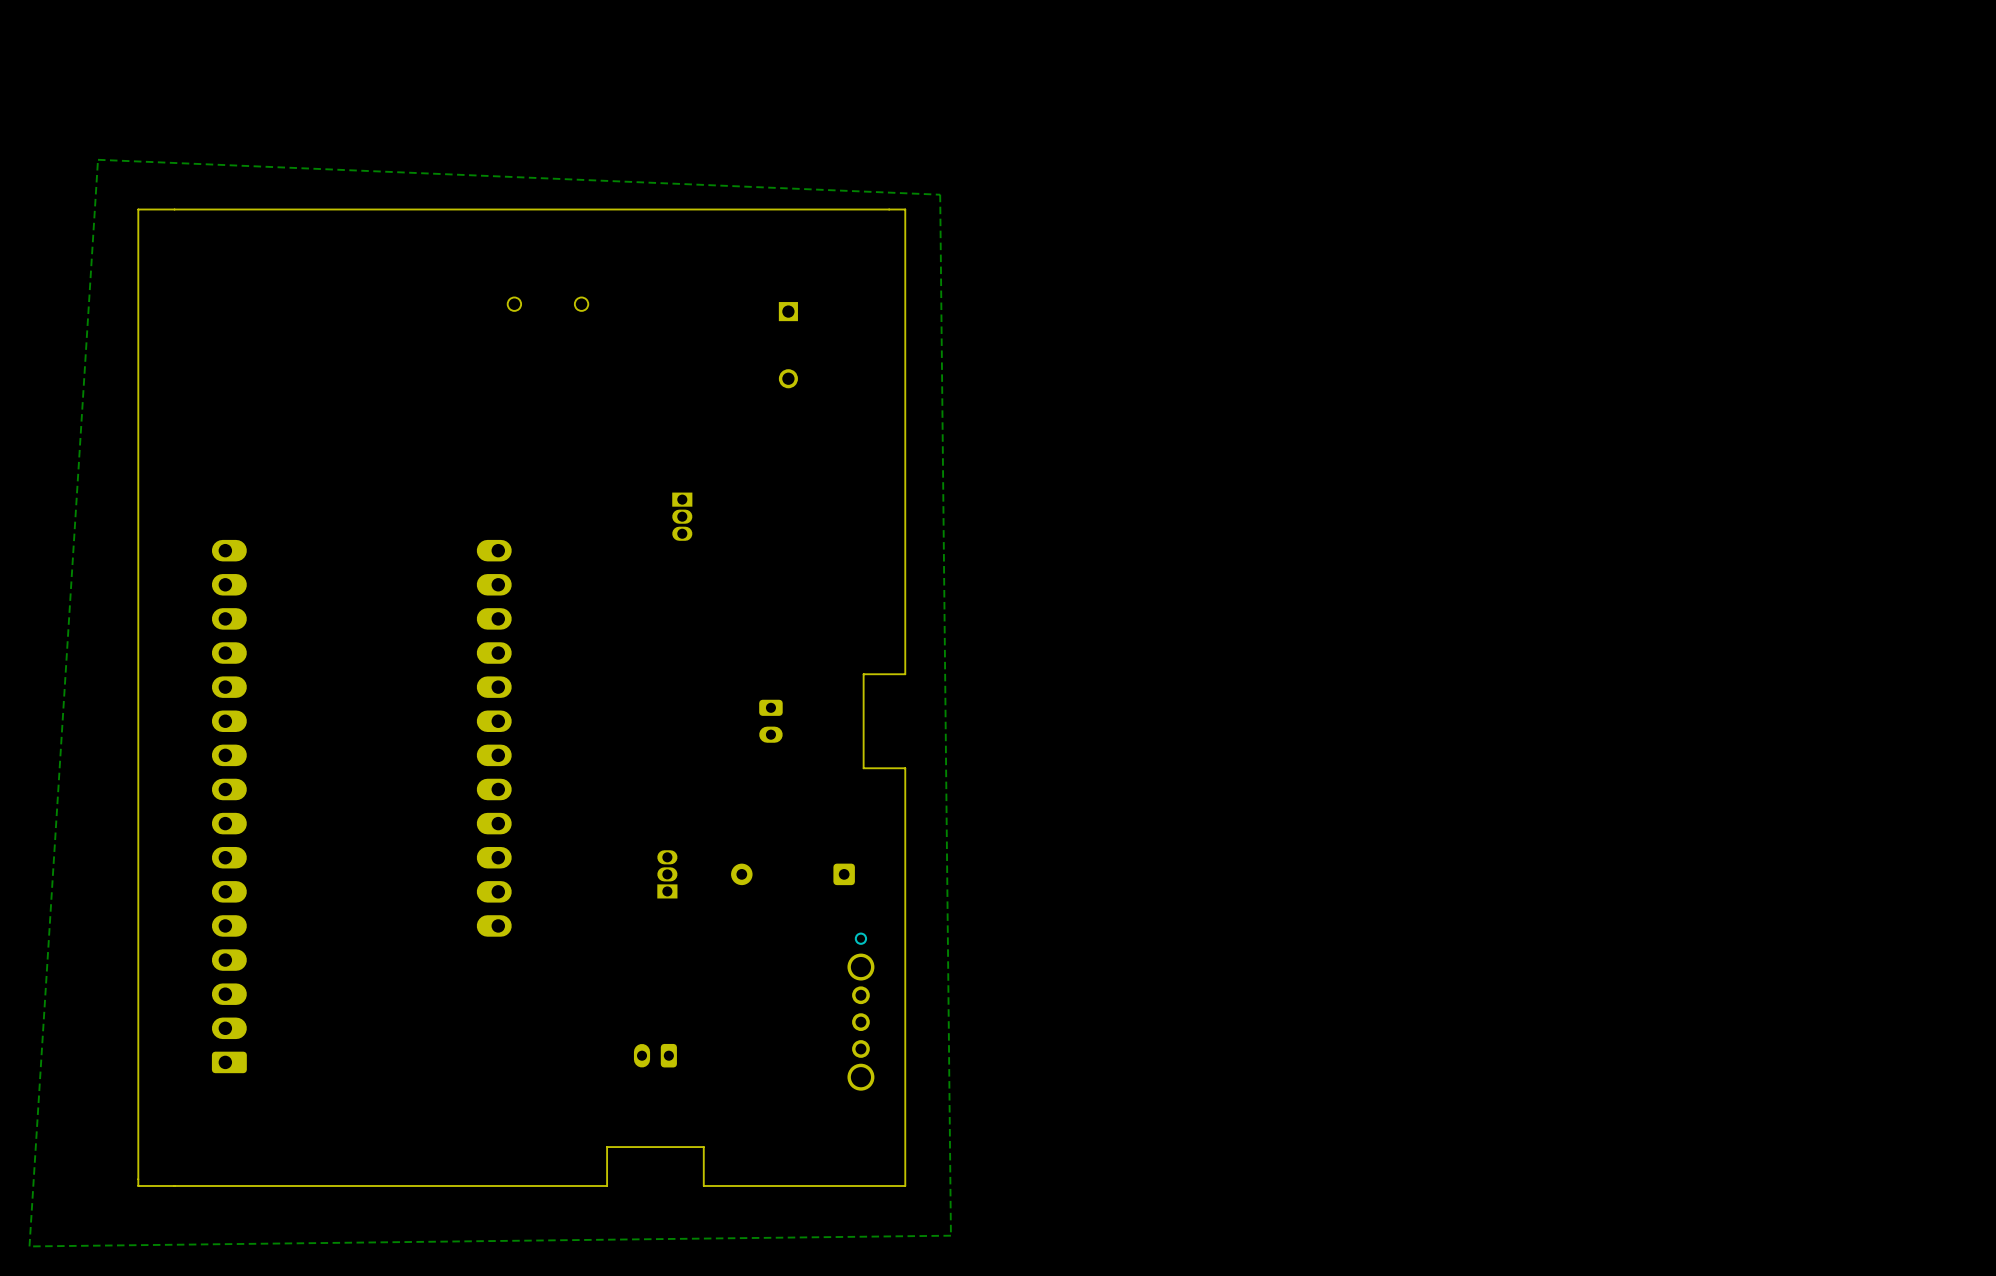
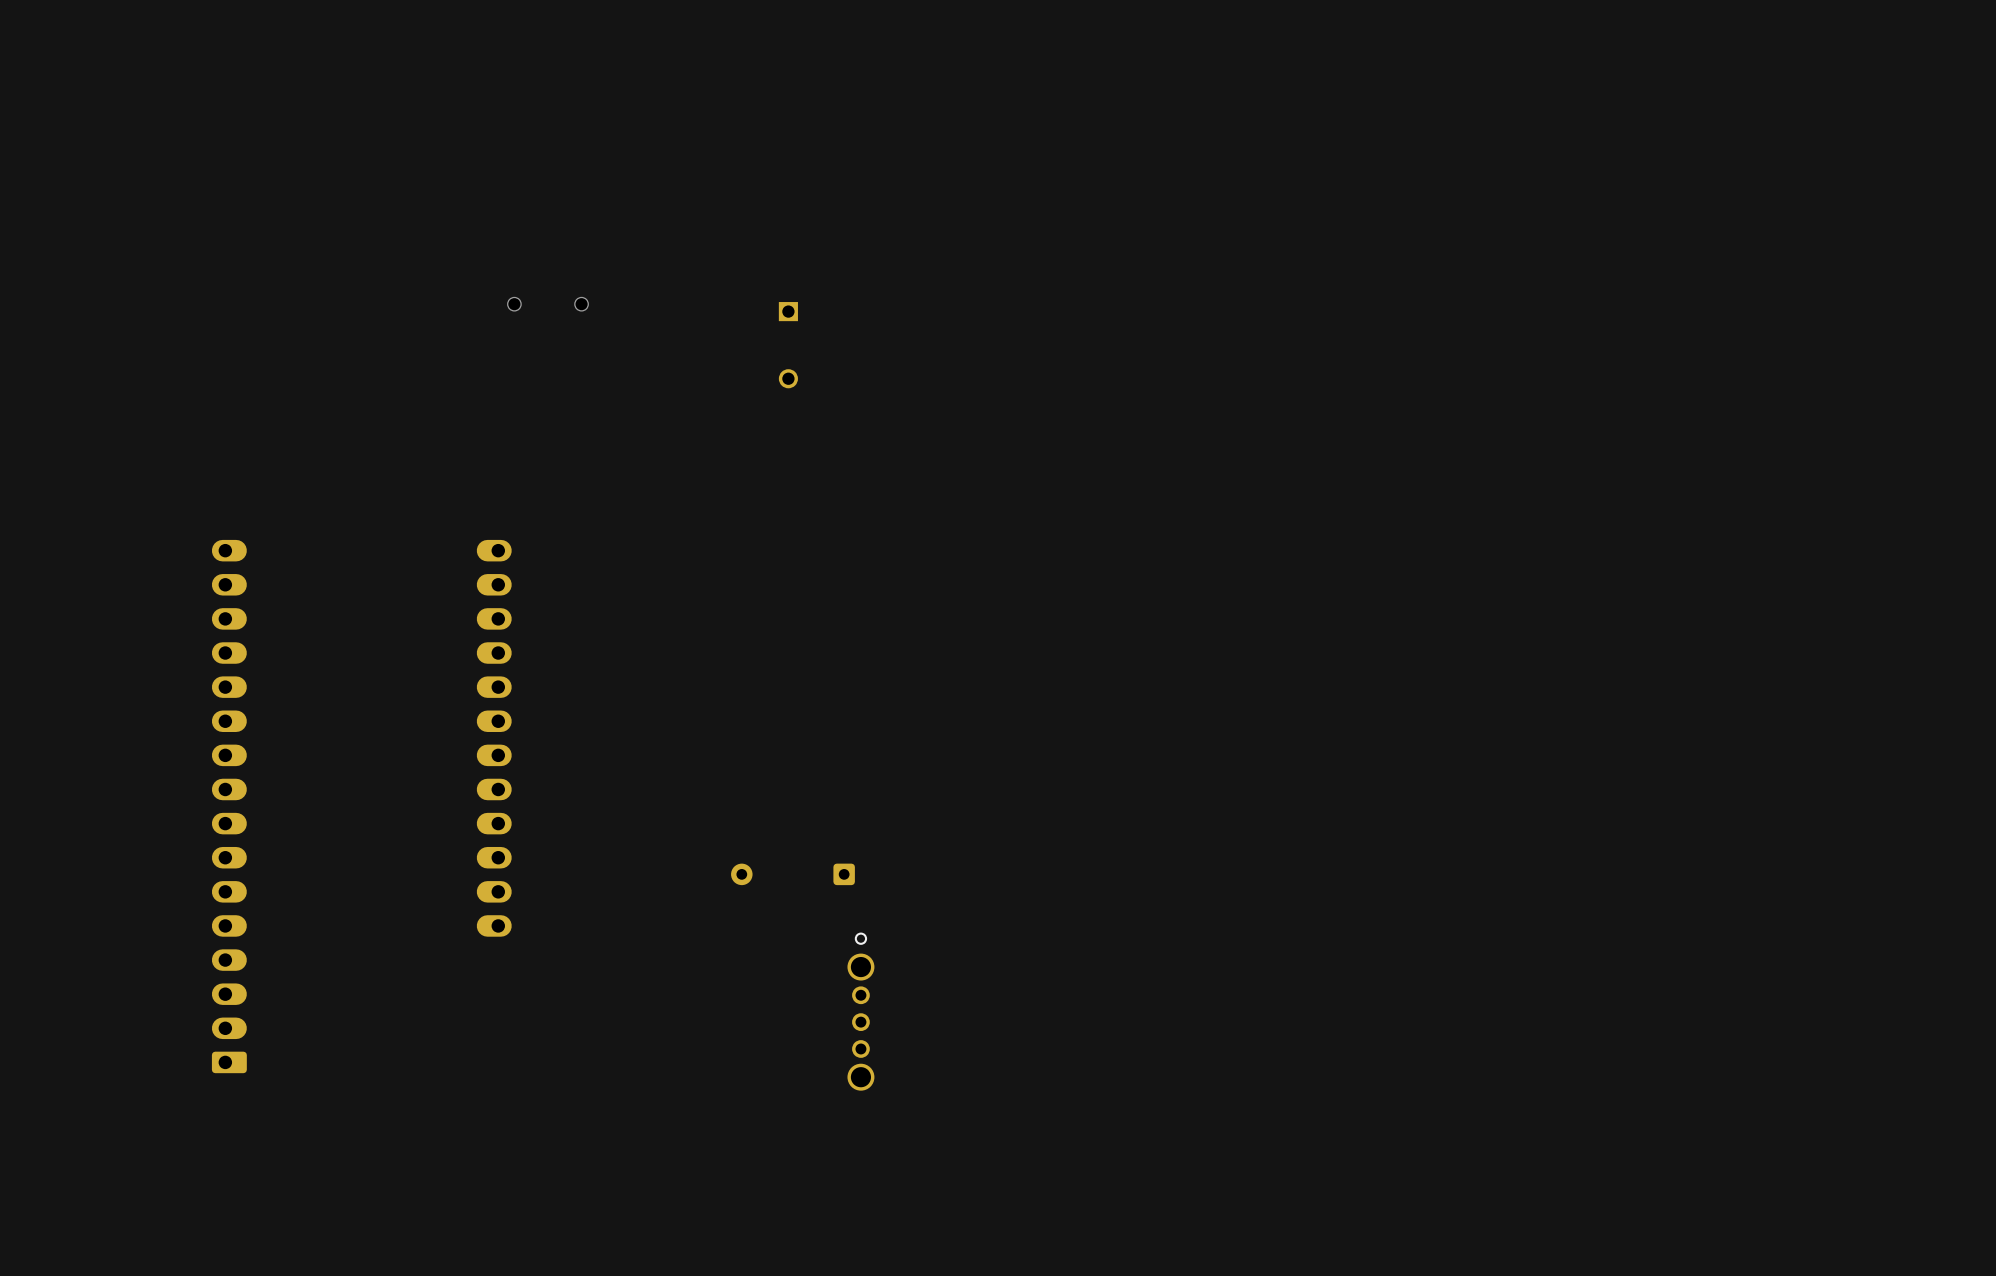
zone outline: (98, 159) (29, 1246) (950, 1235) (940, 194) (98, 159) -> none
board edge: (905, 209) (905, 674) (863, 674) (863, 768) (905, 768) (905, 1185) (703, 1185) (703, 1147) (607, 1147) (607, 1185) (138, 1185) (138, 209) (905, 209) -> none
part: (682, 516) -> none
part: (770, 721) -> none
part: (667, 874) -> none
part: (655, 1055) -> none

